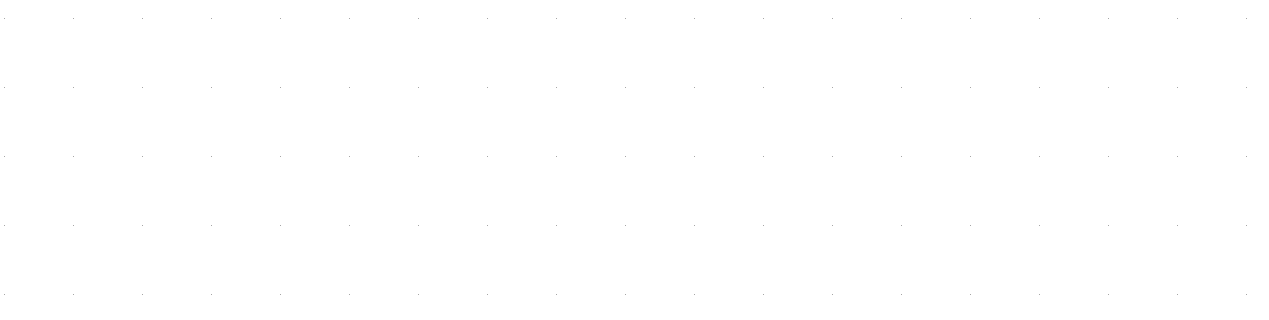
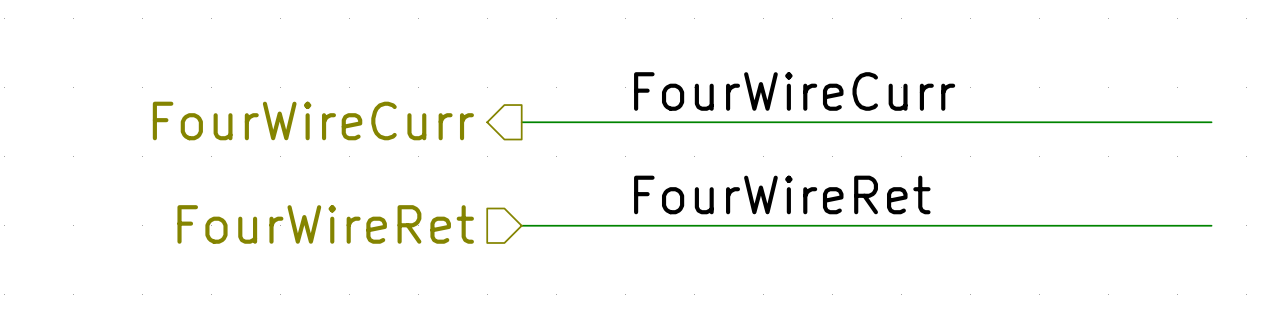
label: none -> FourWireCurr (794, 91)
hierarchical label: none -> FourWireCurr (313, 120)
wire: none -> (521, 122) (1211, 122)
label: none -> FourWireRet (782, 194)
hierarchical label: none -> FourWireRet (325, 224)
wire: none -> (521, 225) (1211, 225)

